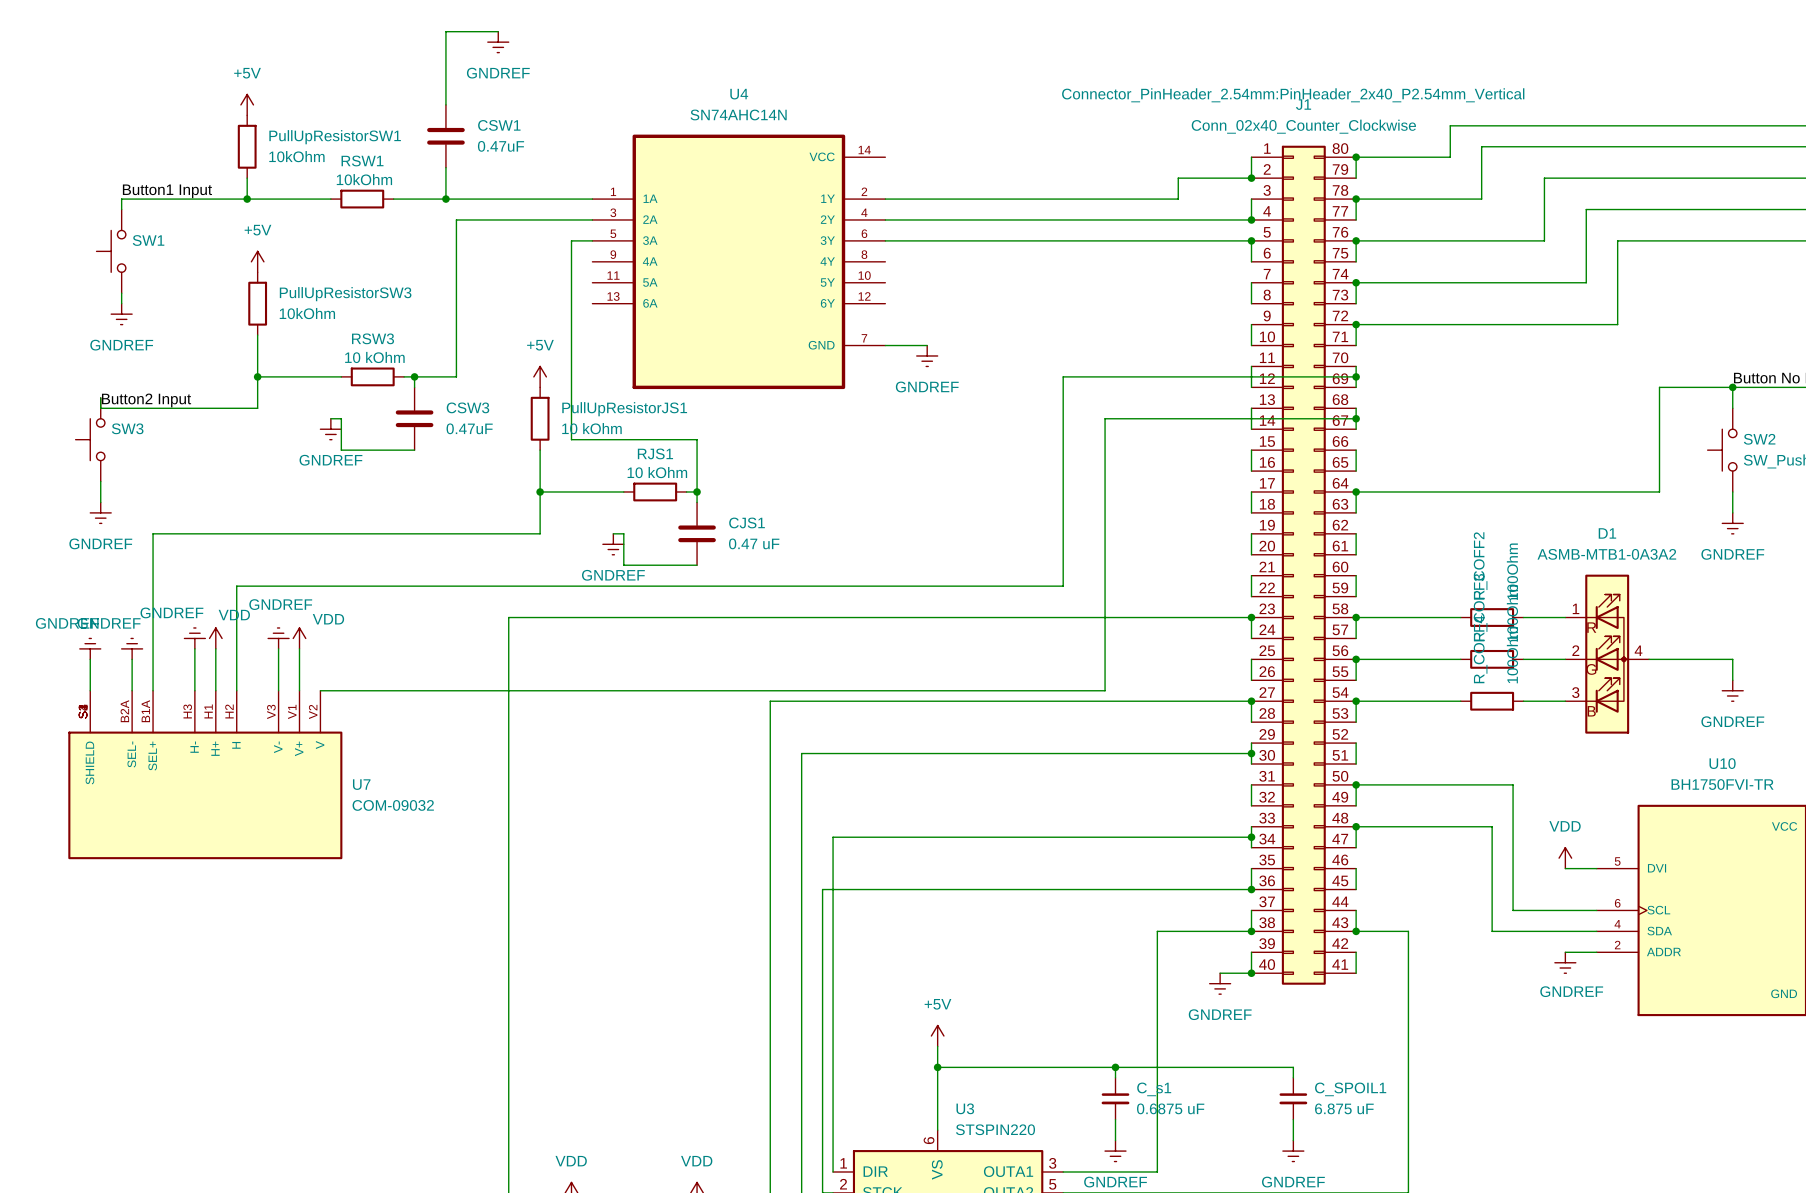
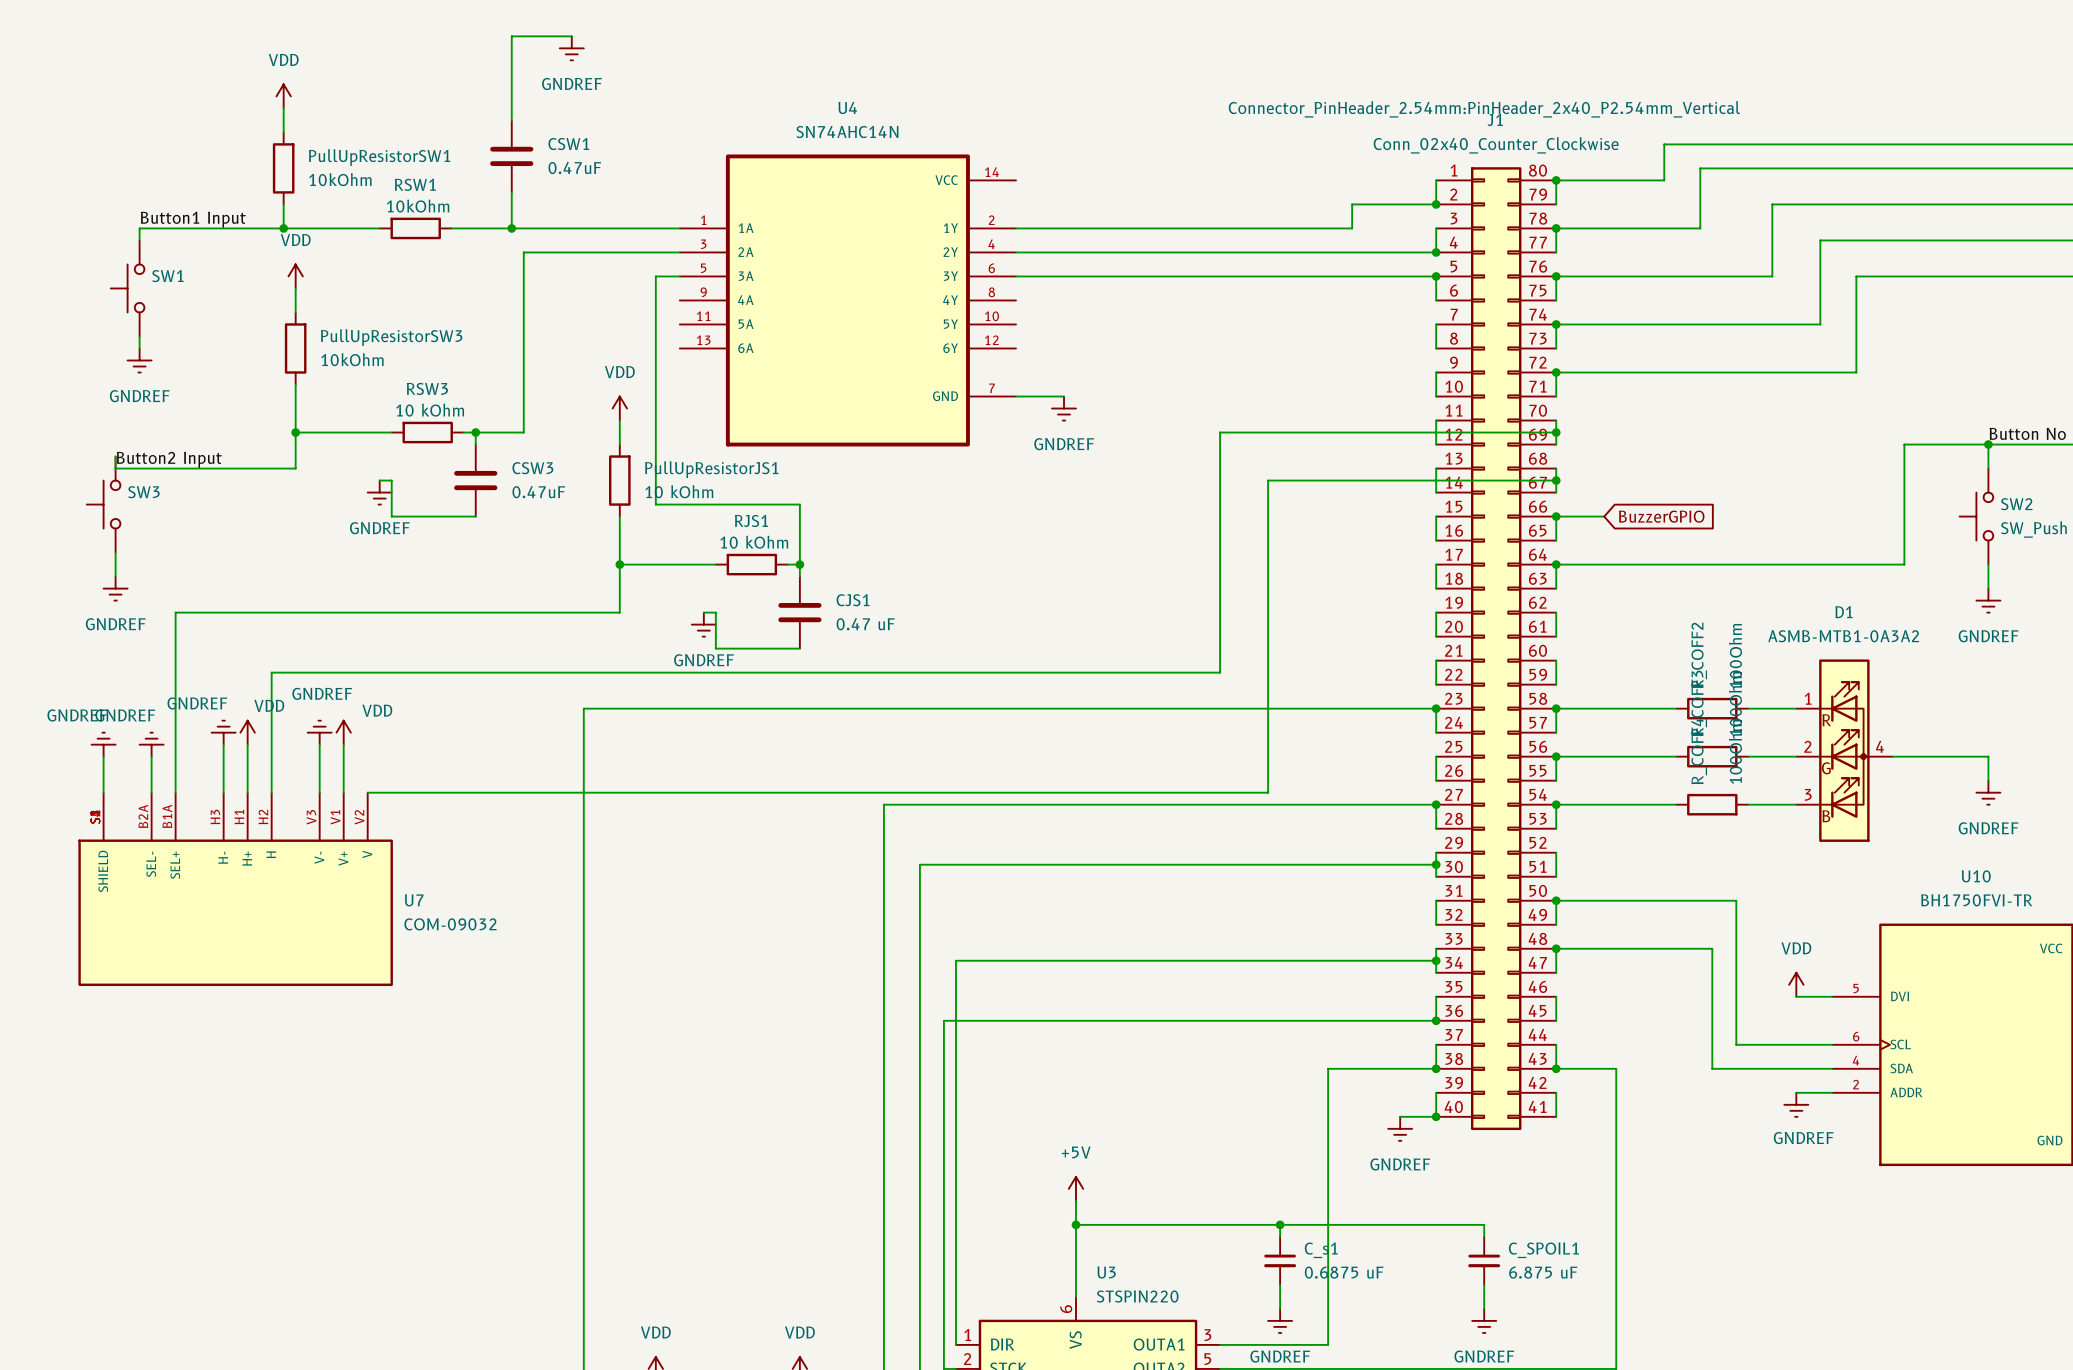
power symbol: none -> VDD (283, 96)
power symbol: +5V (247, 104) -> none
power symbol: none -> VDD (295, 276)
power symbol: +5V (257, 261) -> none
power symbol: none -> VDD (619, 408)
power symbol: +5V (540, 376) -> none
wire: none -> (1556, 516) (1604, 516)
junction: none -> (1556, 516)
global label: none -> BuzzerGPIO (1661, 516)

